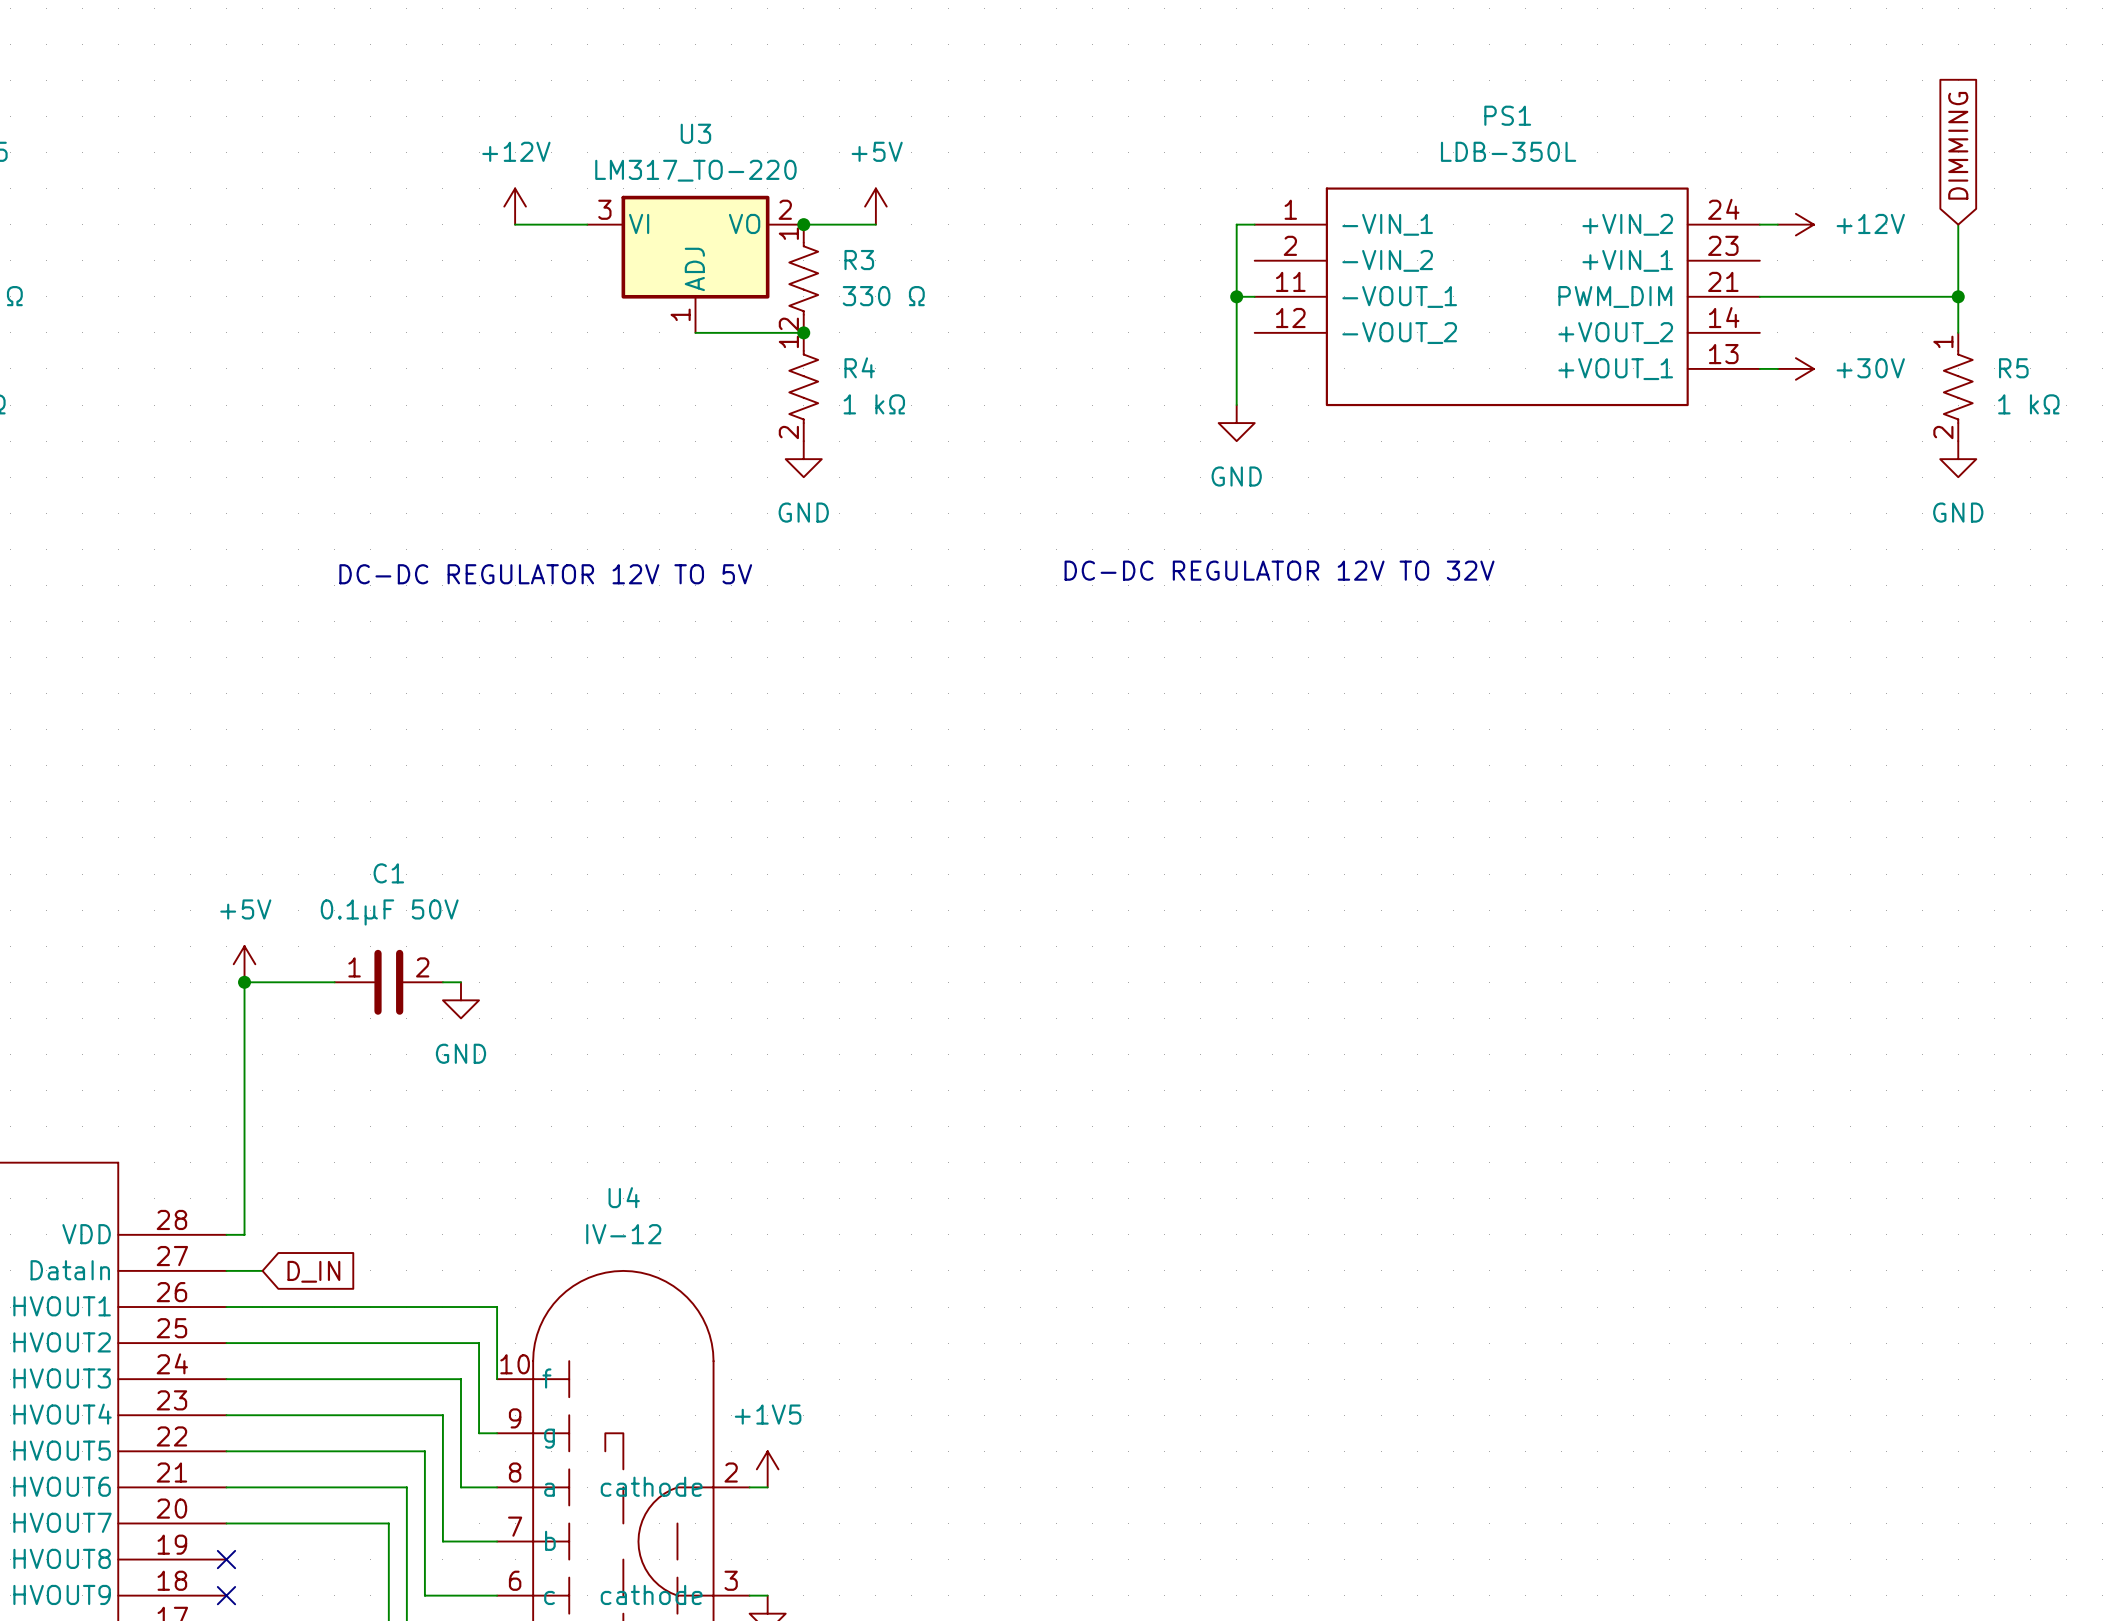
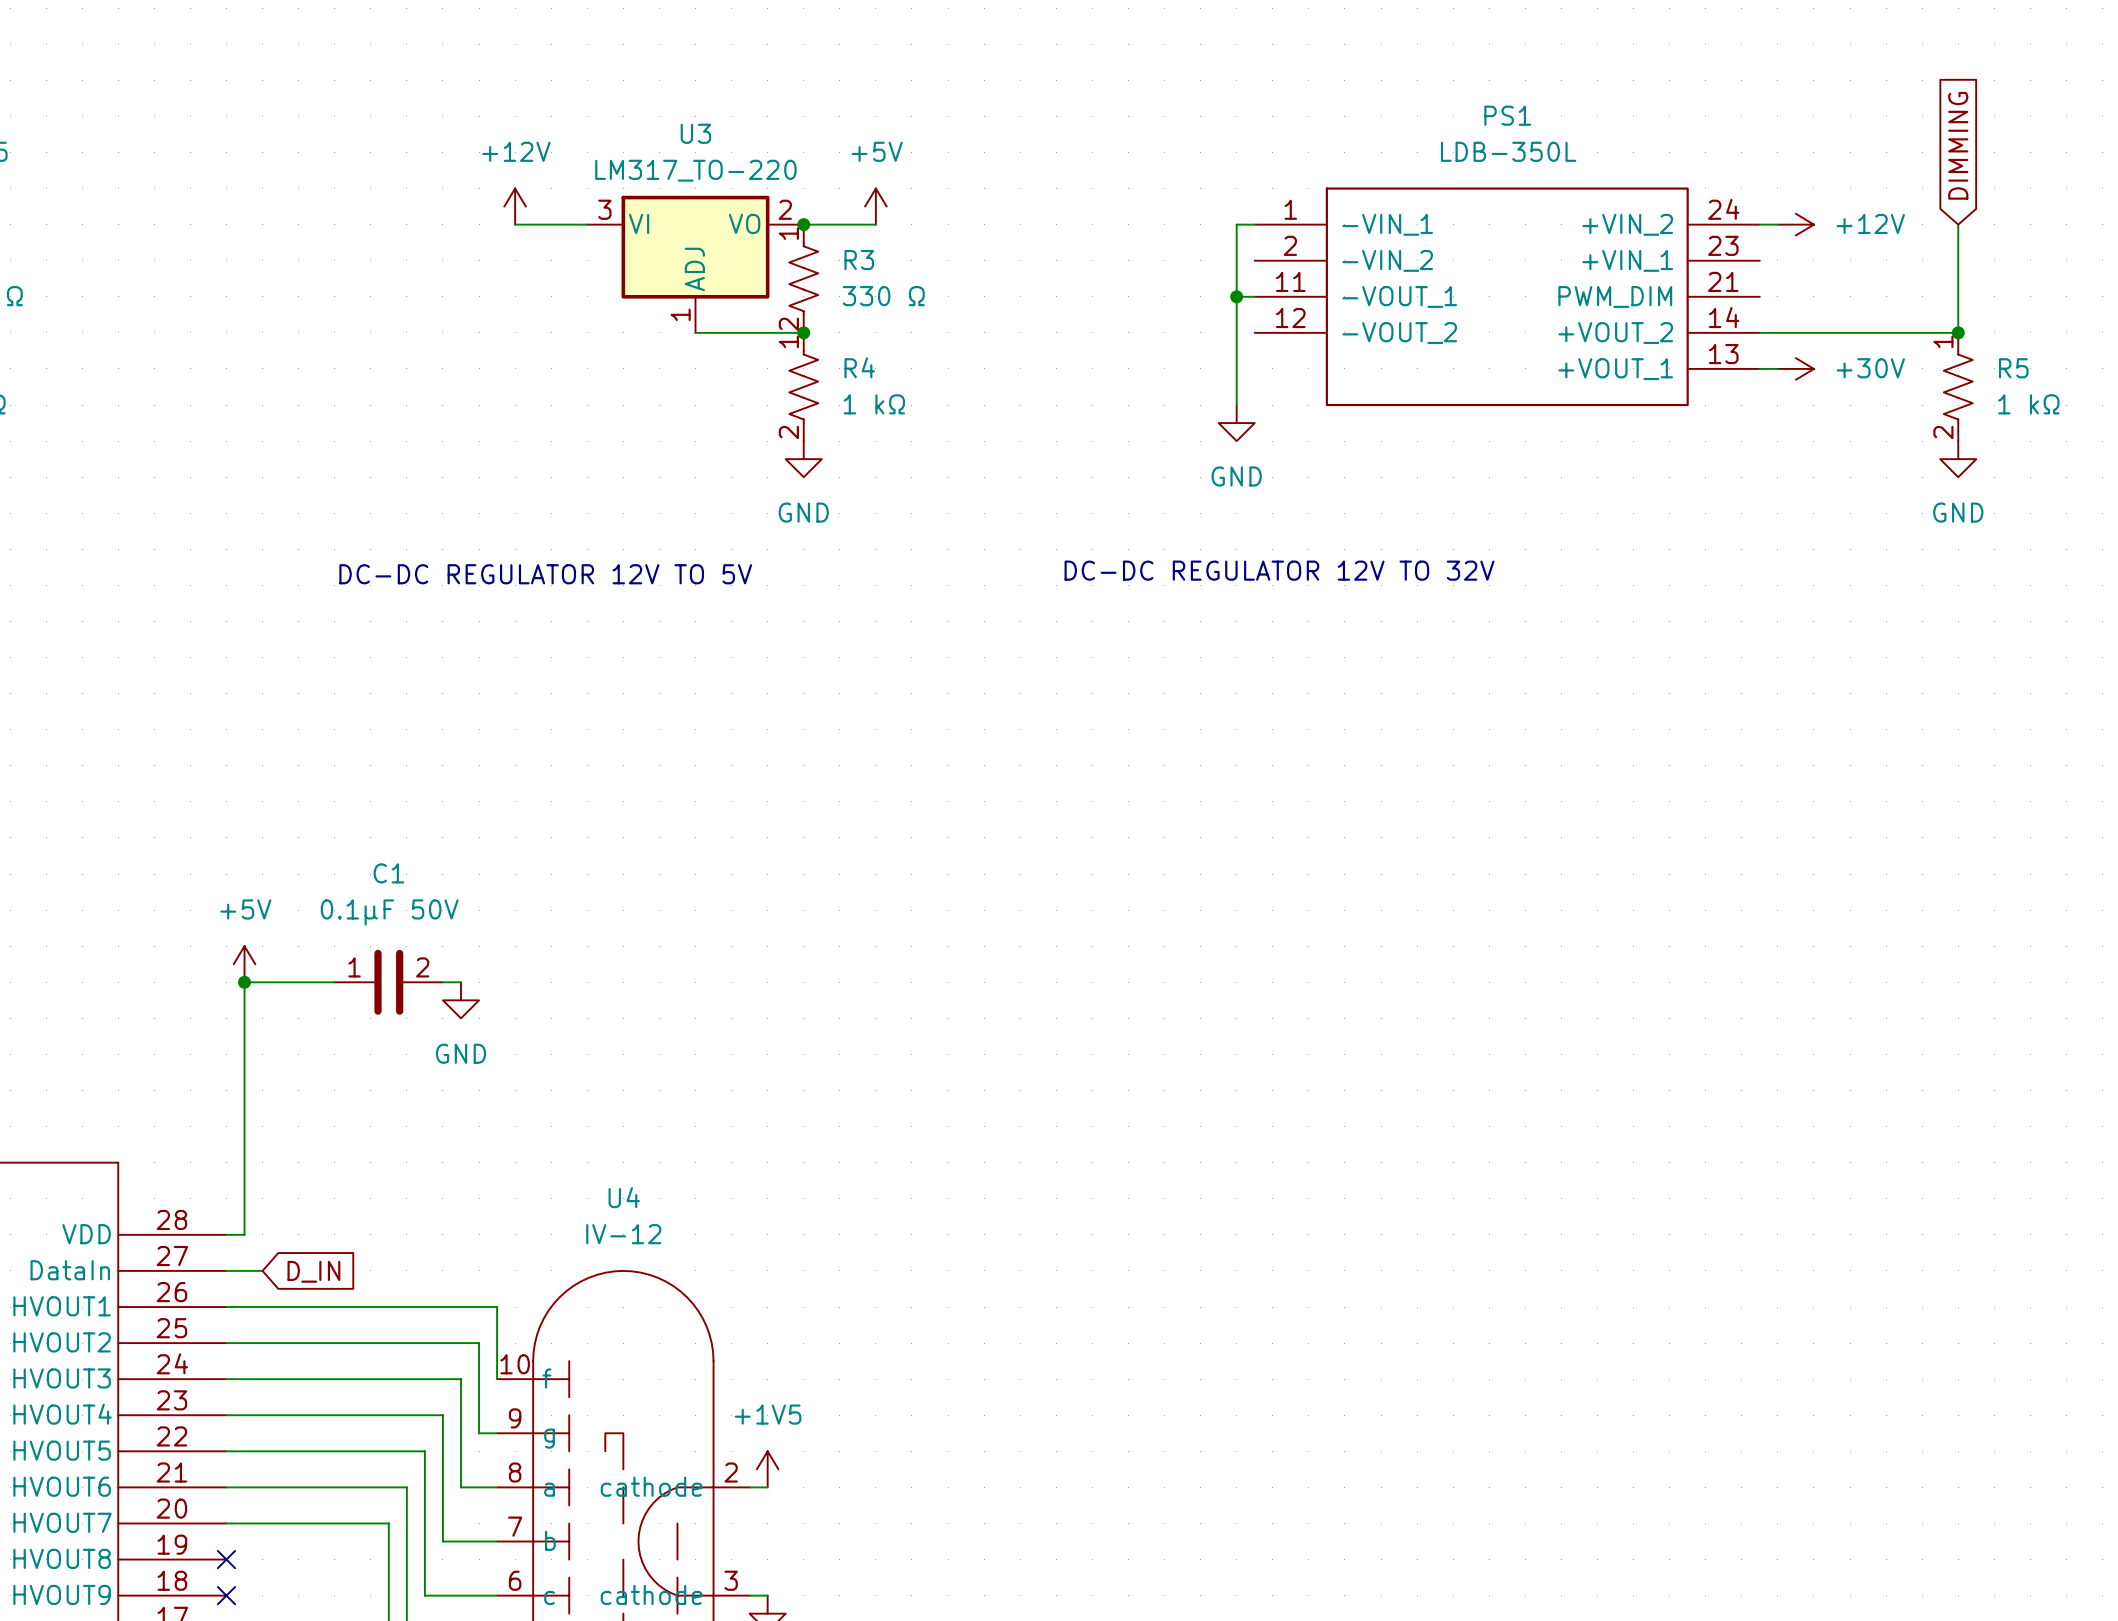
wire: (1759, 296) (1958, 296) -> (1759, 332) (1958, 332)
junction position: (1958, 296) -> (1958, 332)

